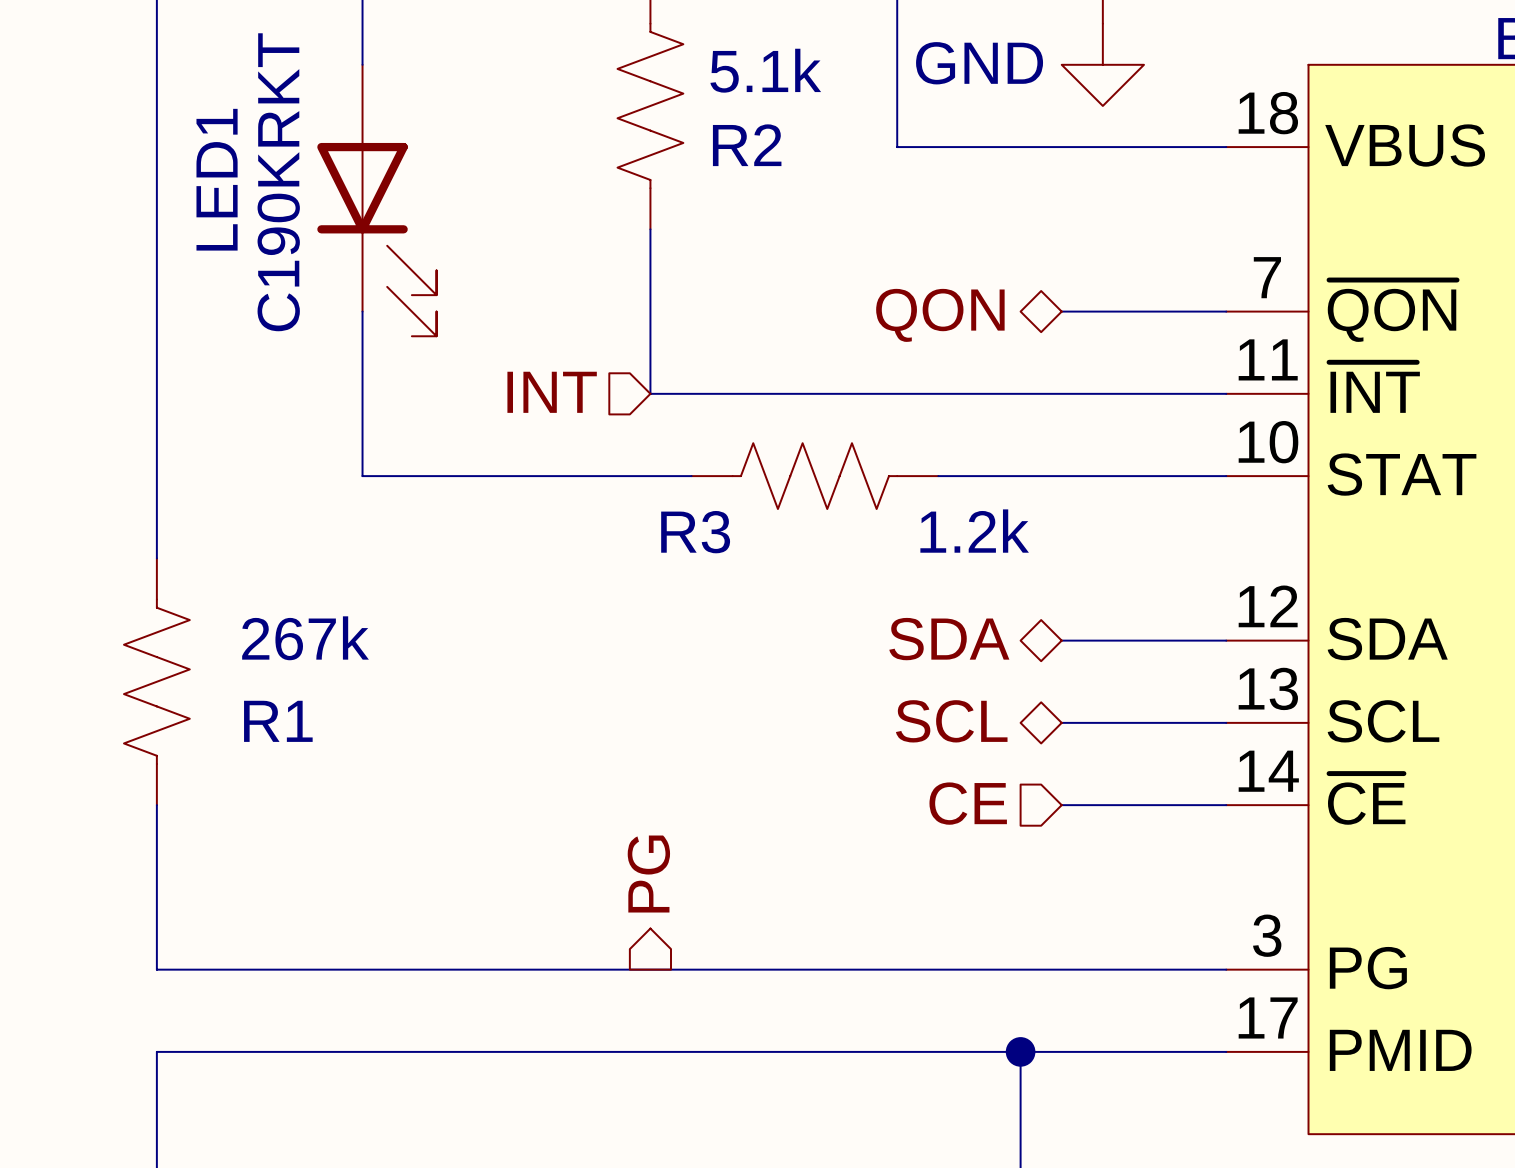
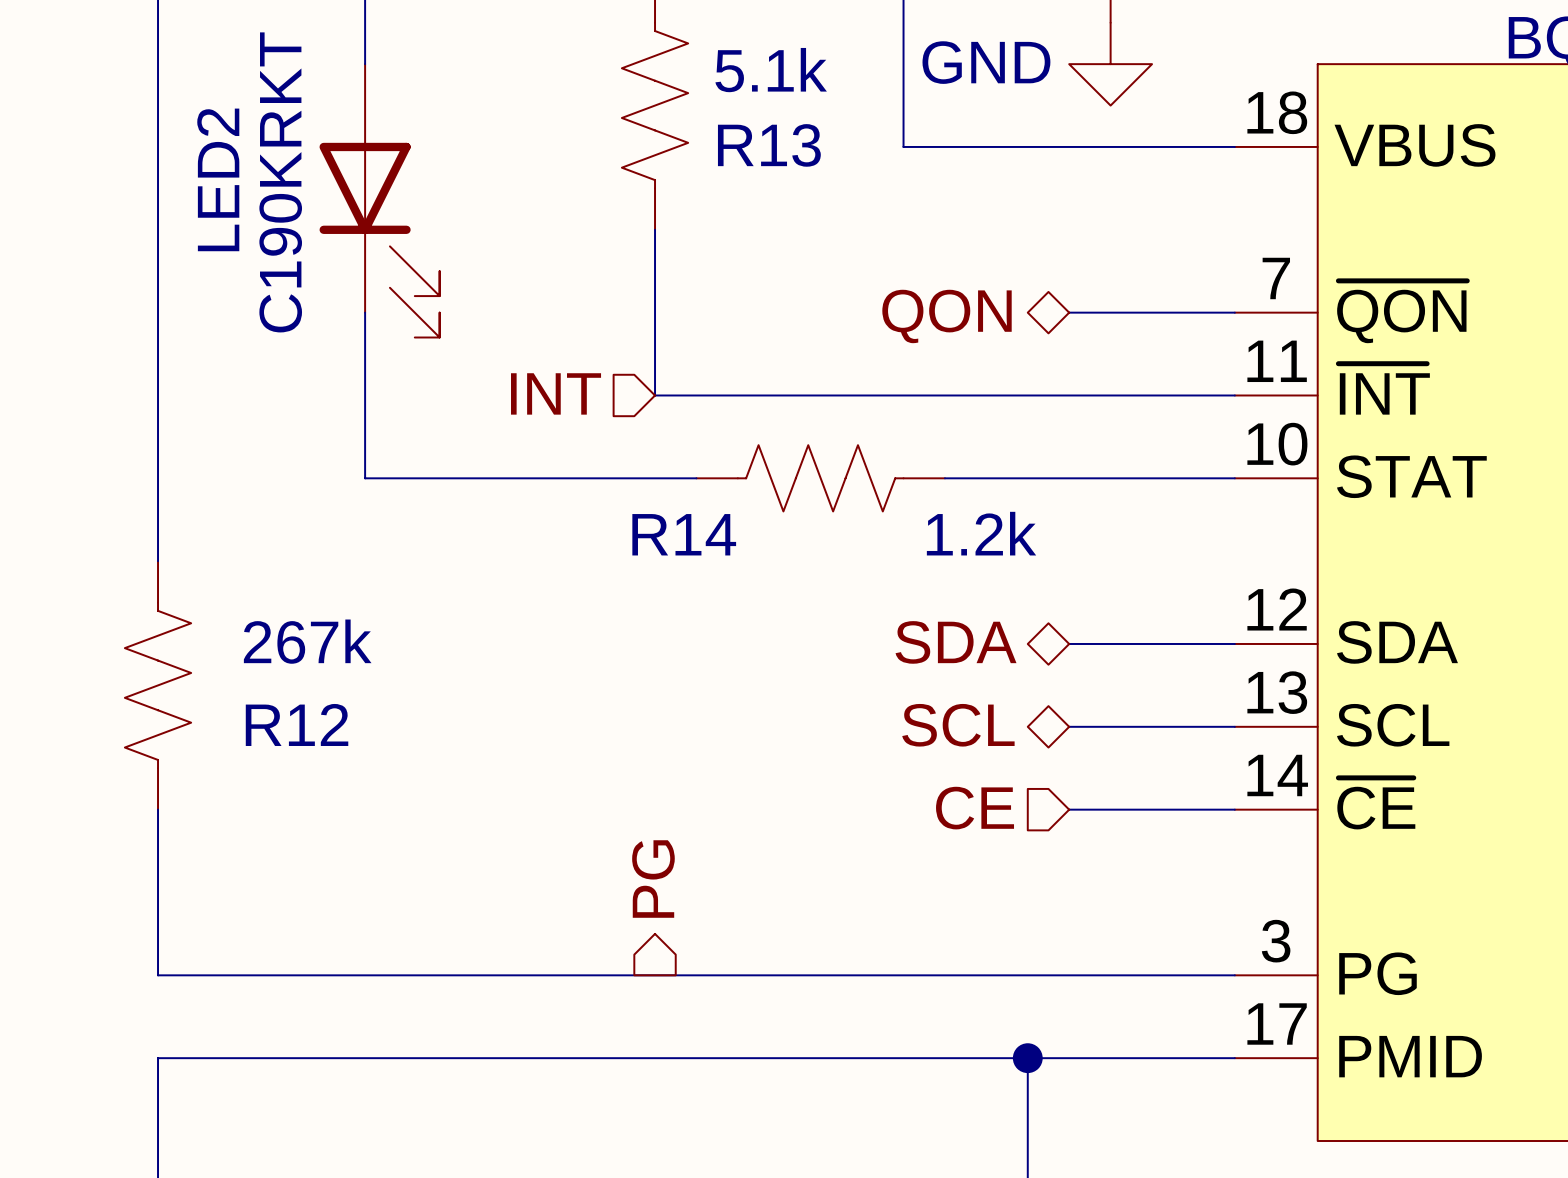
R2 name: R2 (747, 145) -> R13 (769, 145)
LED1 name: LED1 (217, 179) -> LED2 (218, 179)
R3 name: R3 (695, 532) -> R14 (684, 534)
R1 name: R1 (278, 721) -> R12 (297, 724)

